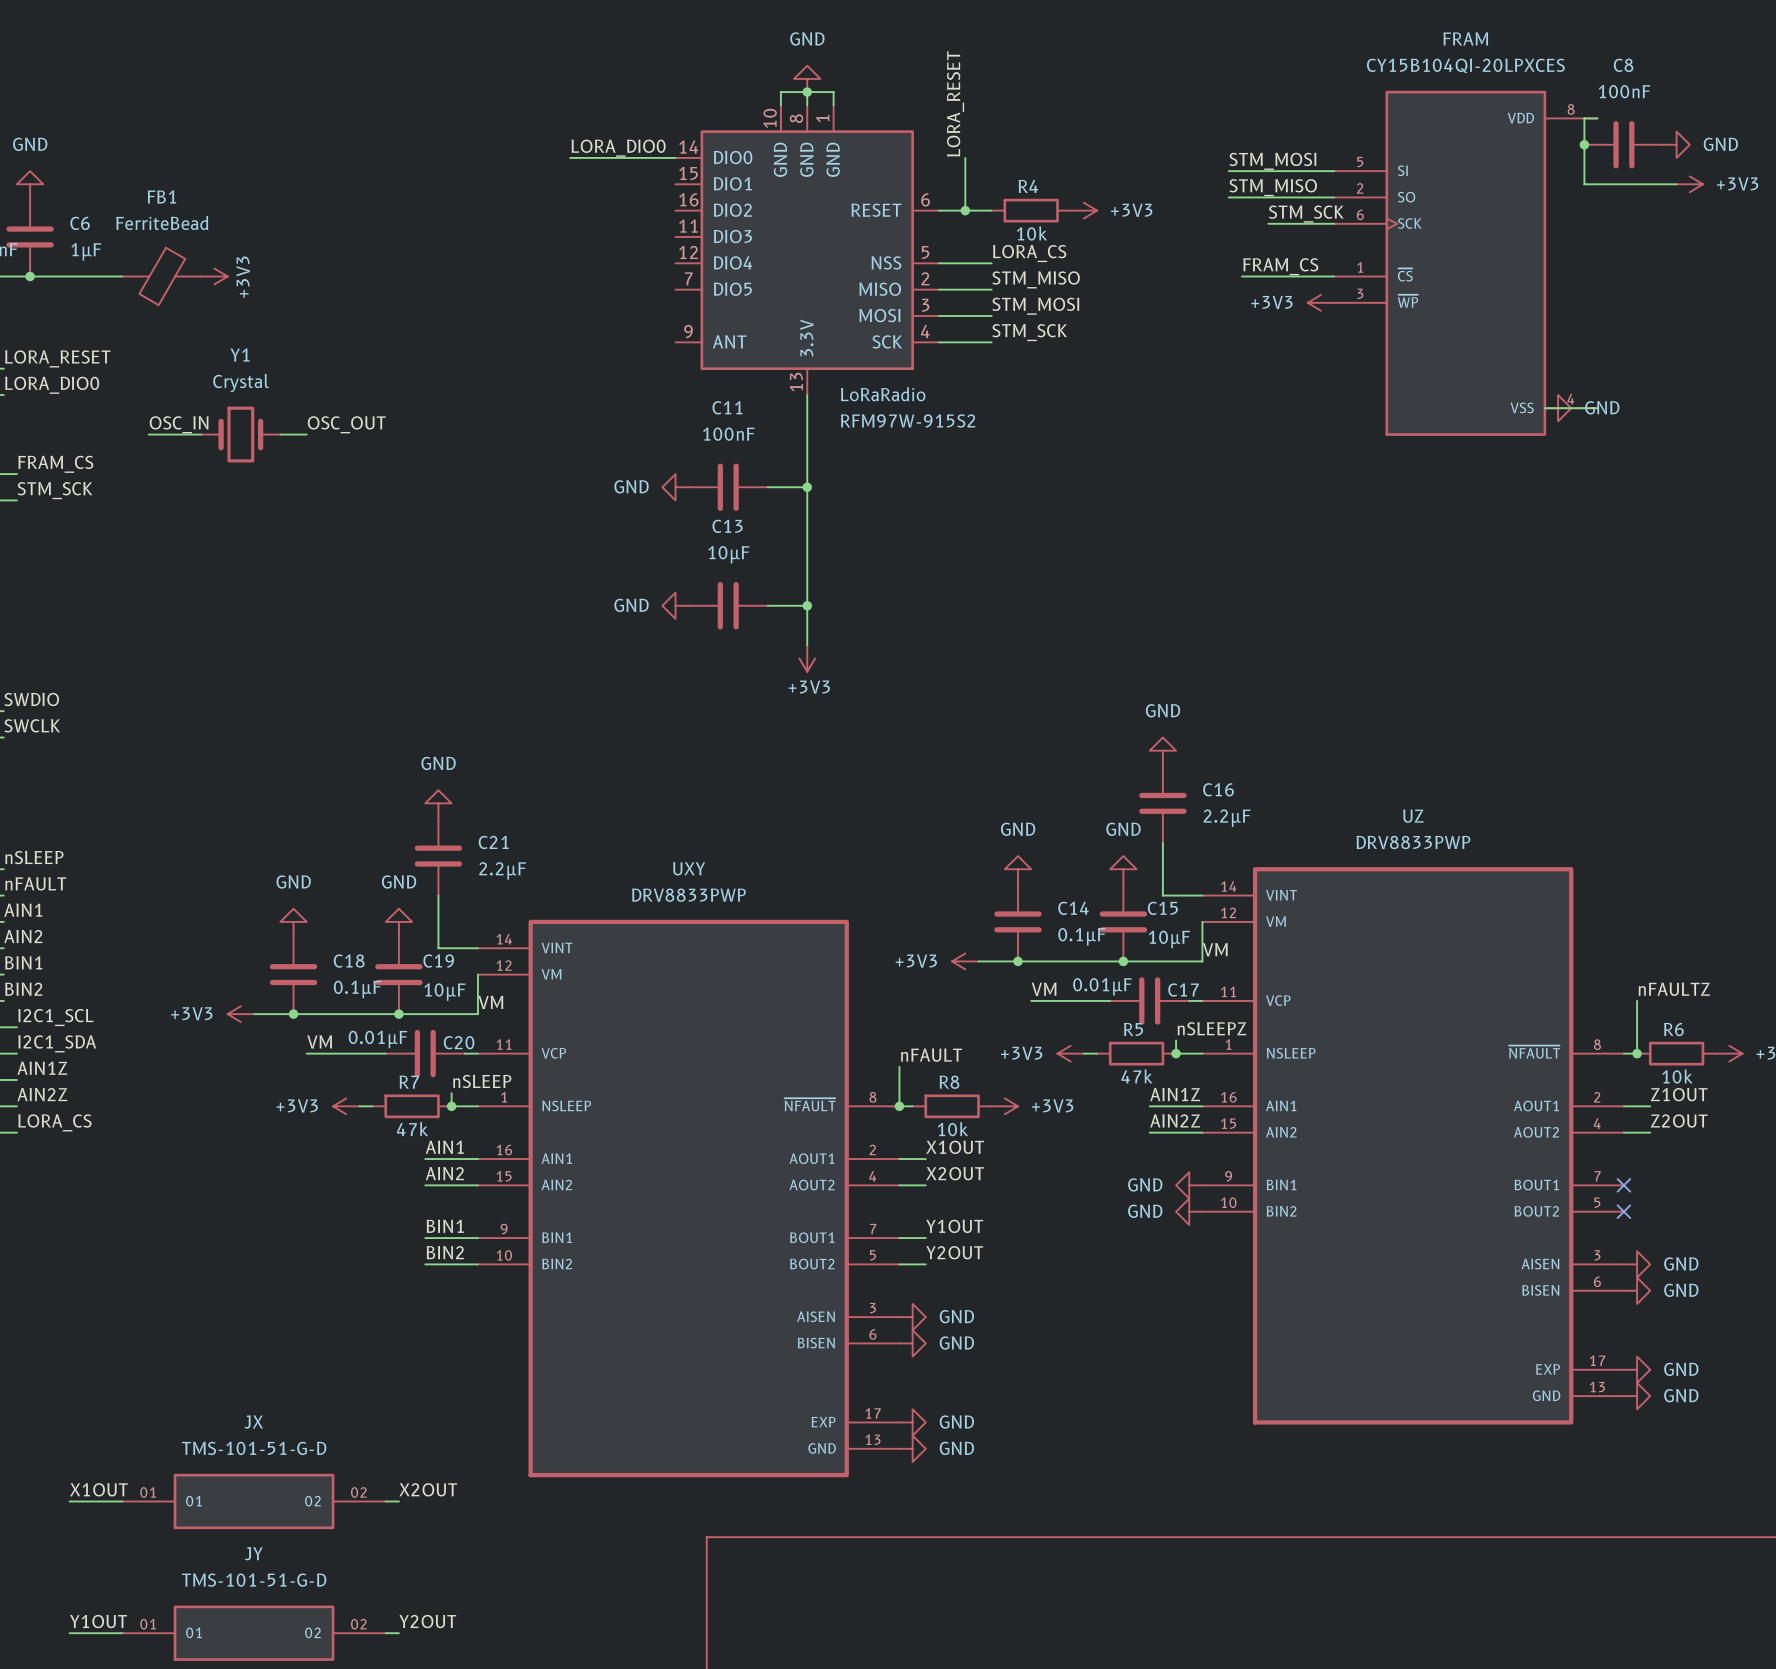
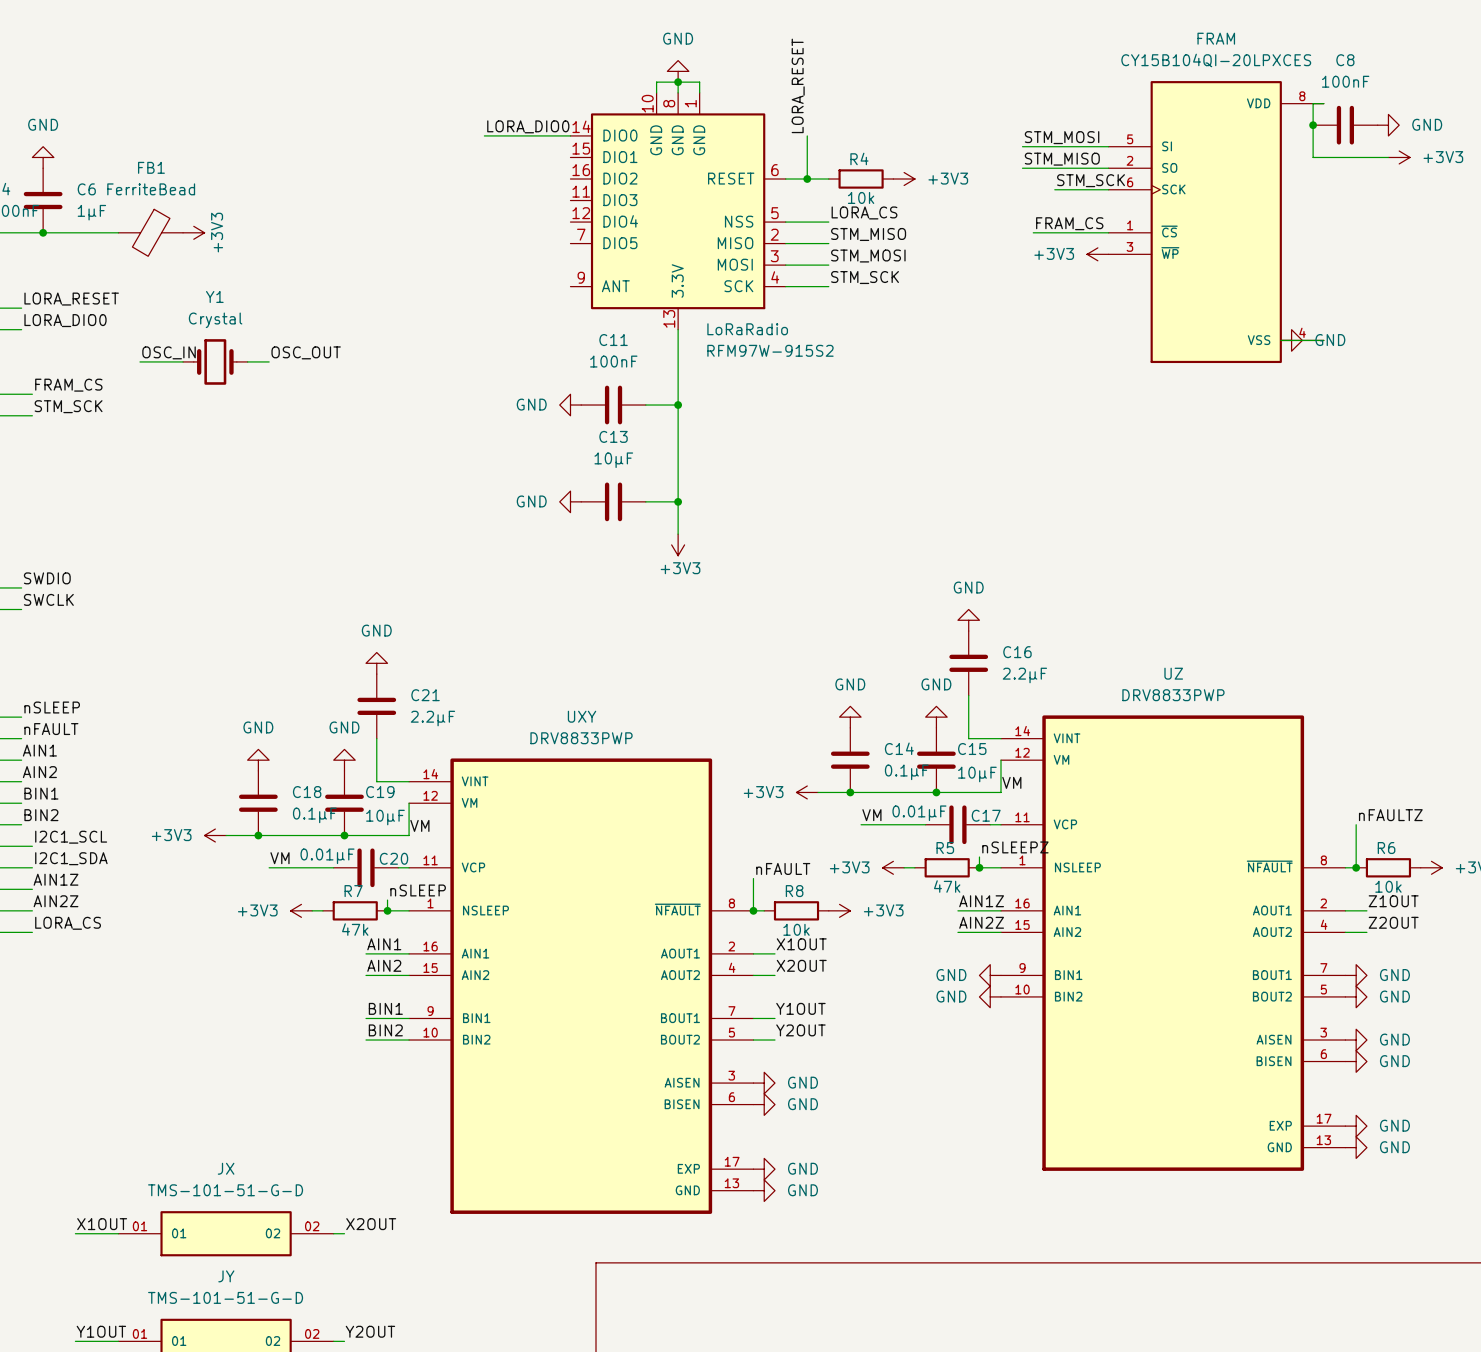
no-connect mark: (1623, 1185) -> none
power symbol: none -> GND (1356, 975)
no-connect mark: (1623, 1211) -> none
power symbol: none -> GND (1356, 996)

